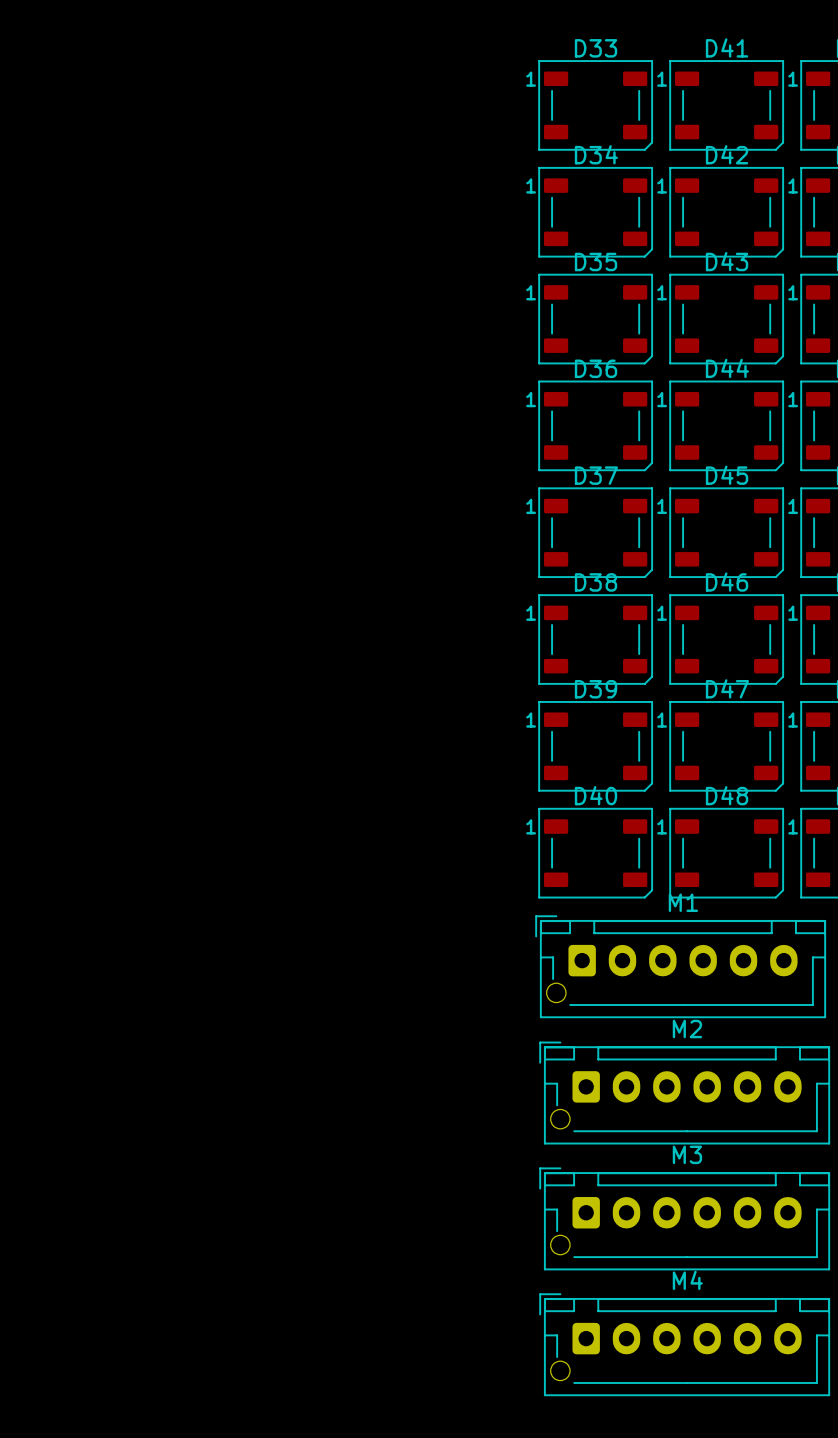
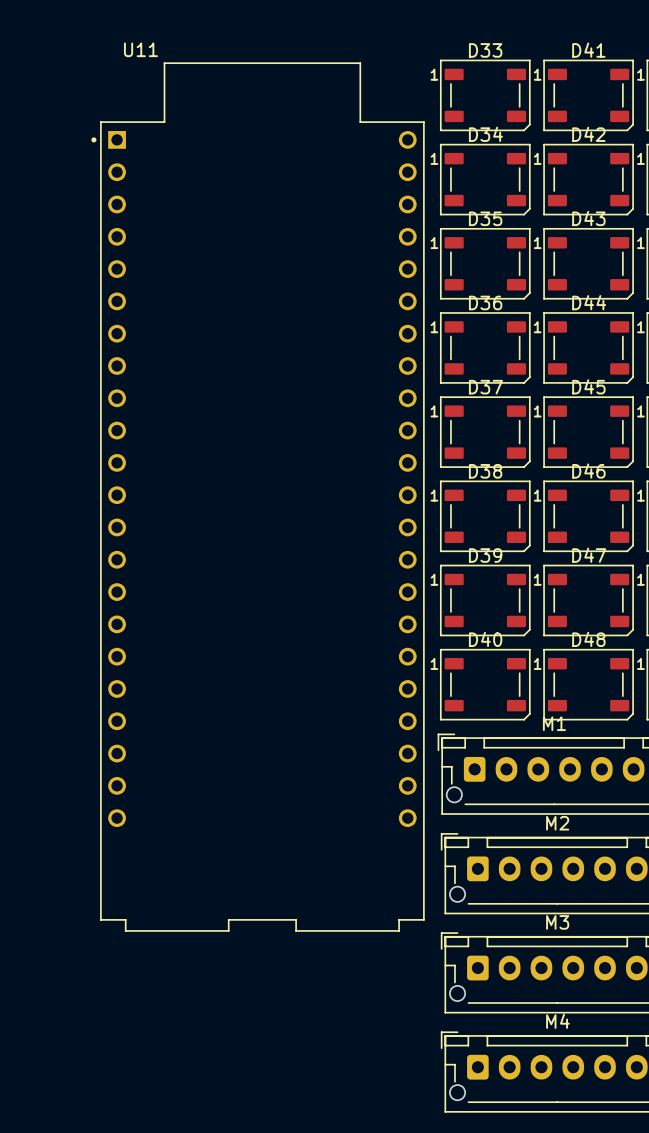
U11: none -> (258, 497)

